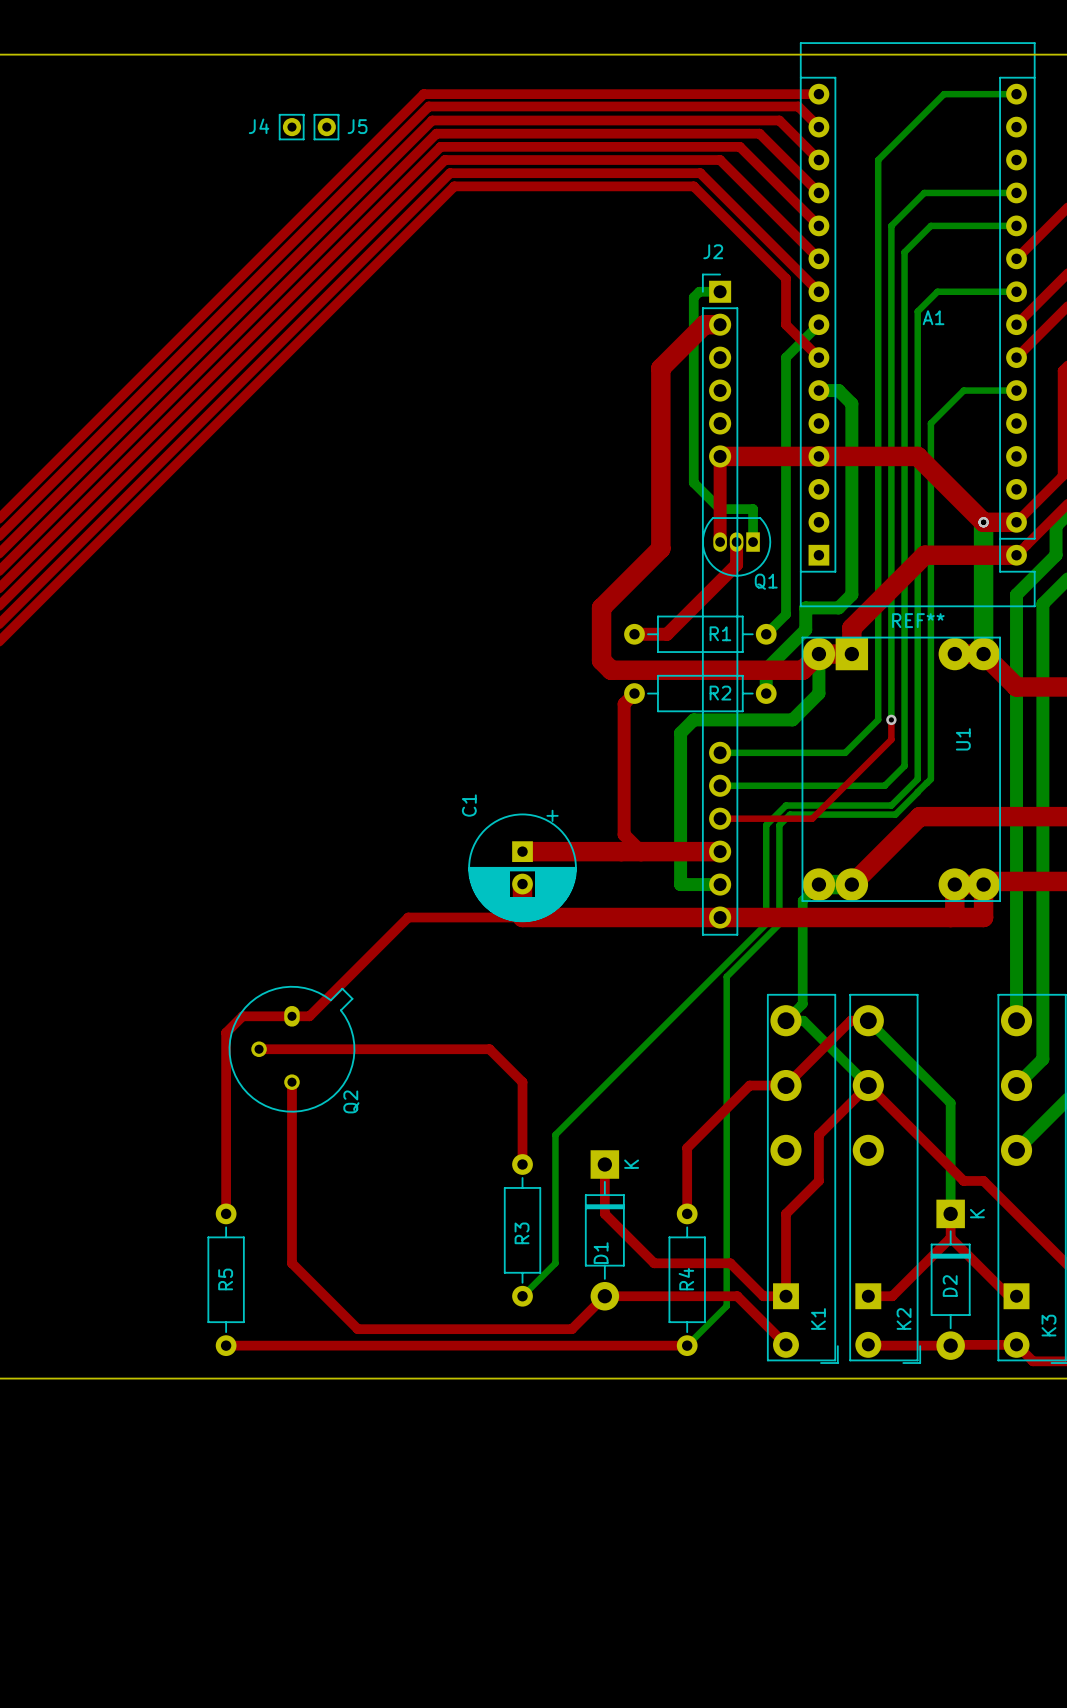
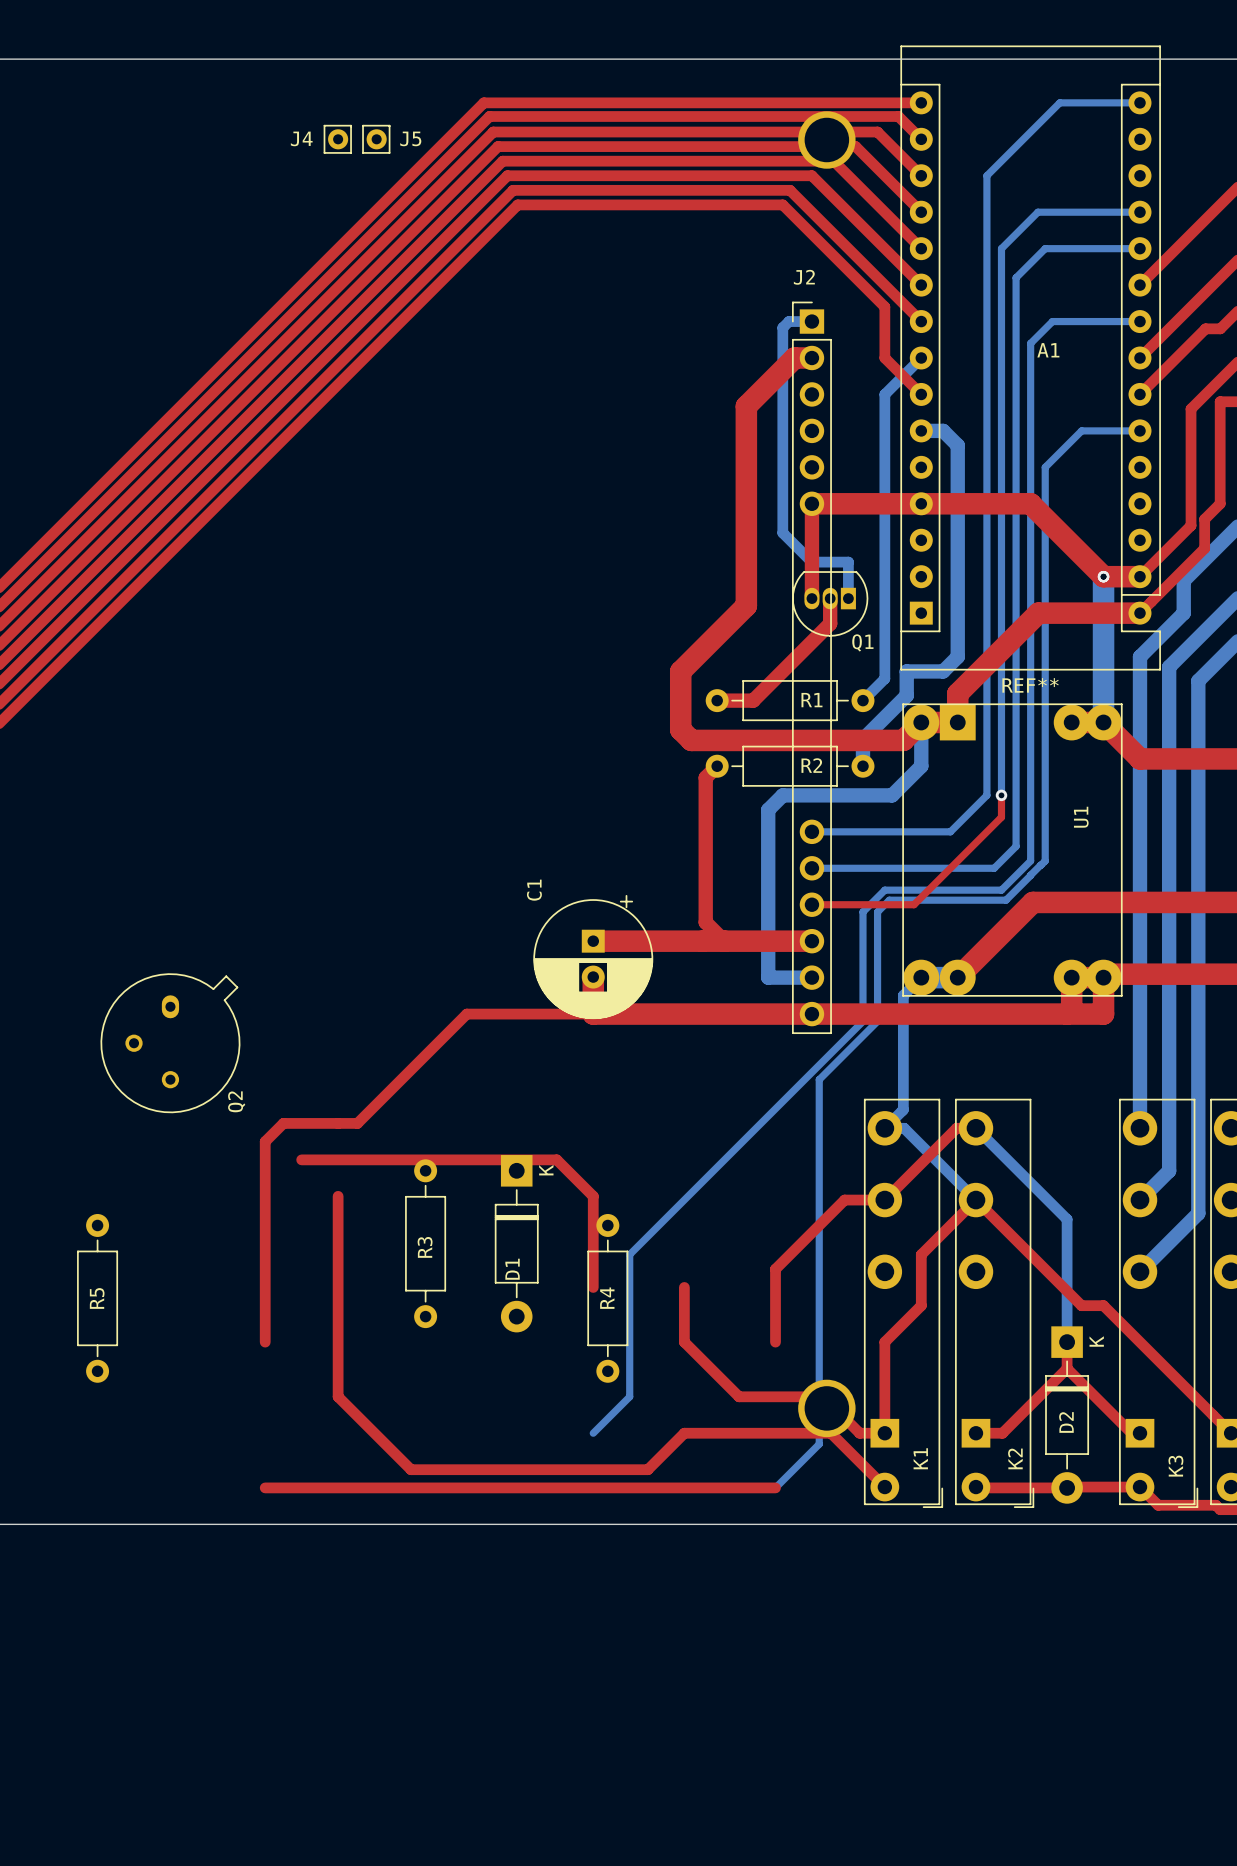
part: none -> (826, 140)
Q2 position: (291, 1049) -> (170, 1043)
R3 position: (522, 1230) -> (425, 1243)
D1 position: (604, 1230) -> (516, 1243)
part: none -> (826, 1408)
R5 position: (226, 1279) -> (97, 1298)
R4 position: (687, 1279) -> (607, 1298)

